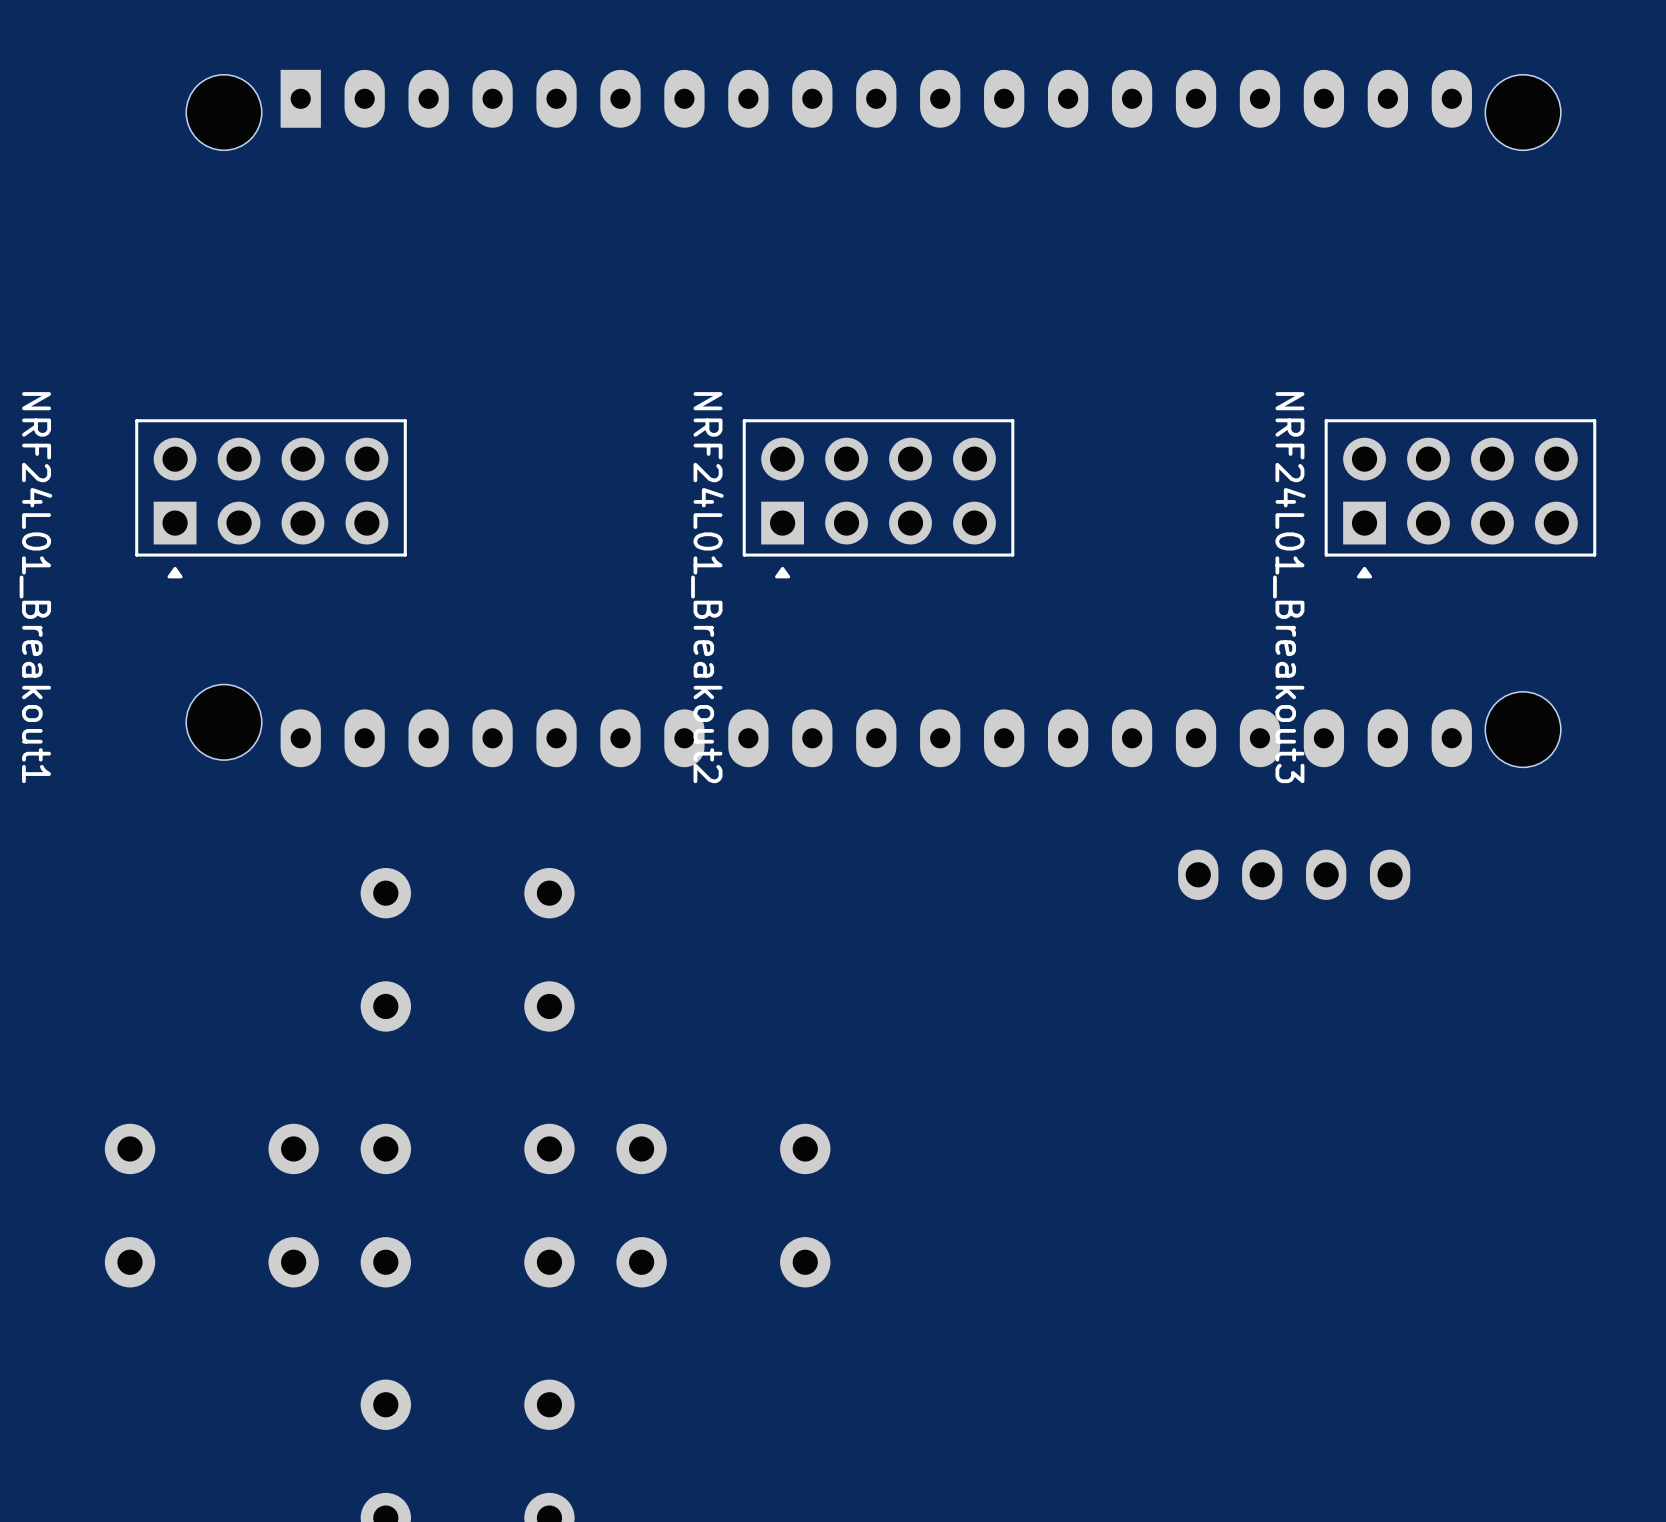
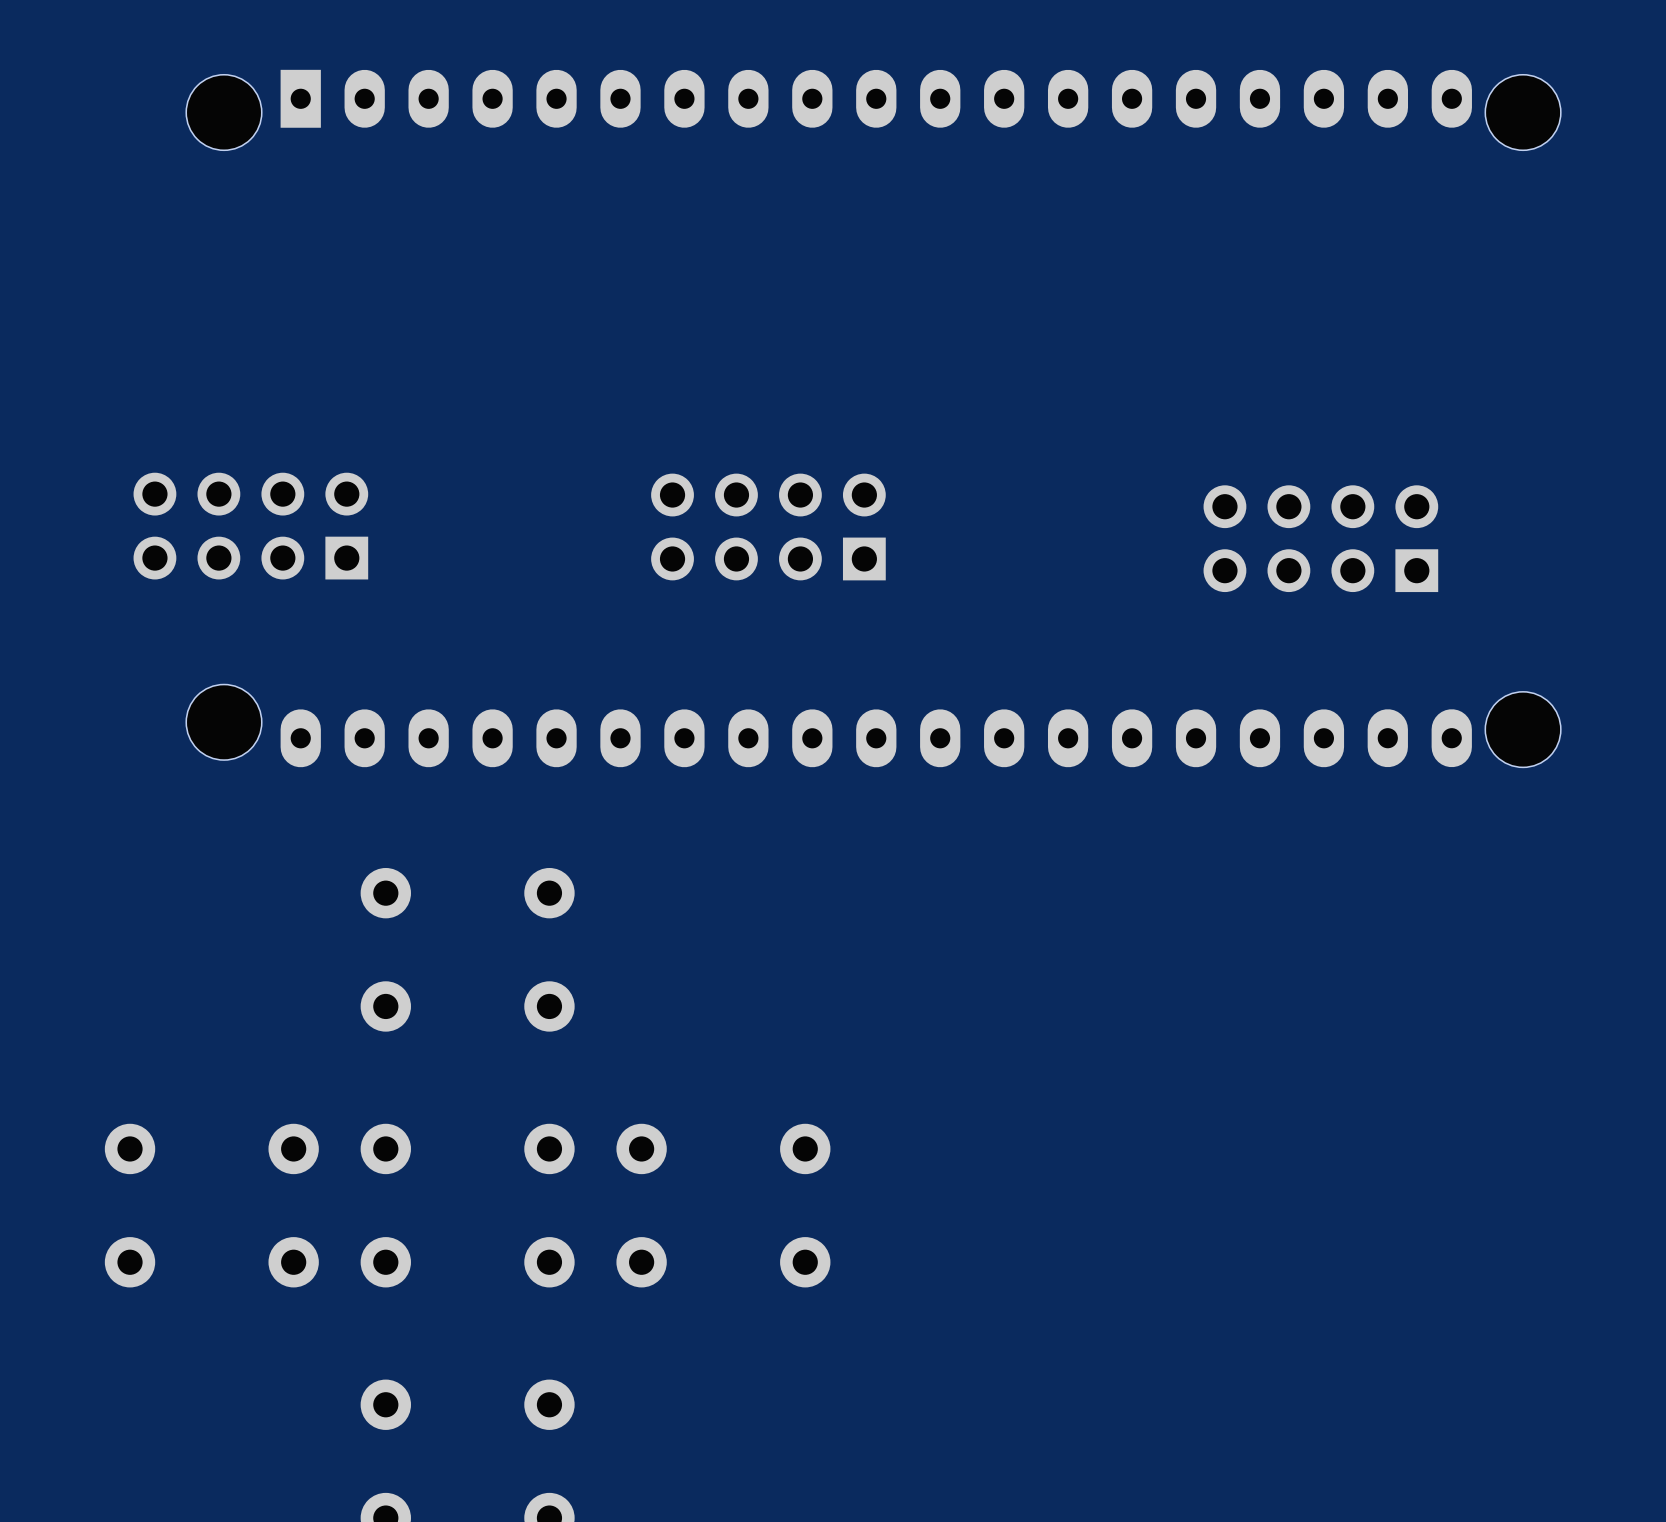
NRF24L01_Breakout1 side: bottom (263, 498) -> top (250, 526)
NRF24L01_Breakout2 side: bottom (871, 498) -> top (768, 527)
NRF24L01_Breakout3 side: bottom (1453, 498) -> top (1320, 538)
part: (1294, 874) -> none

